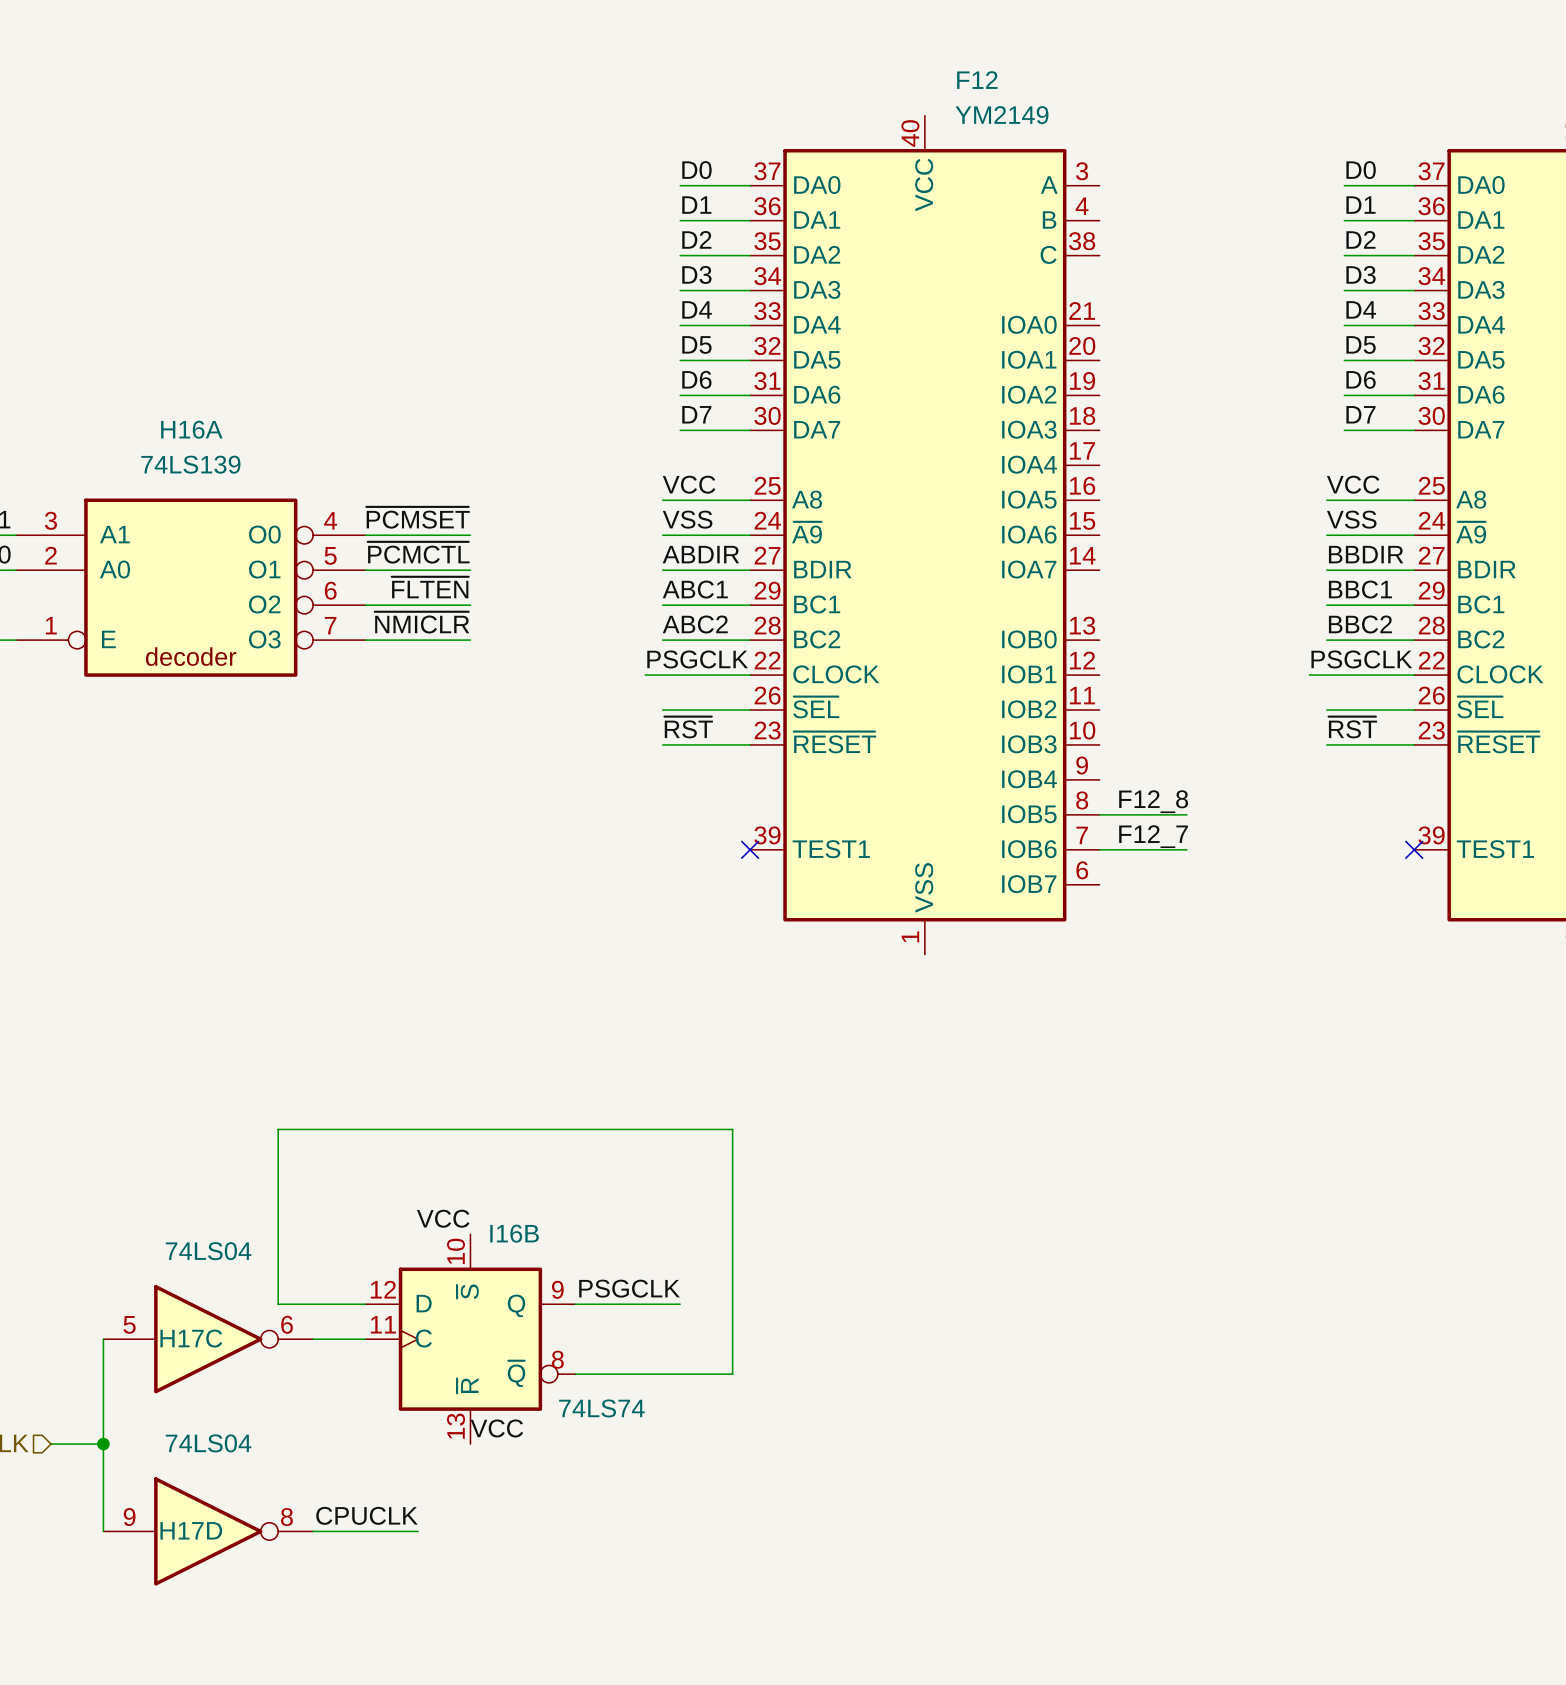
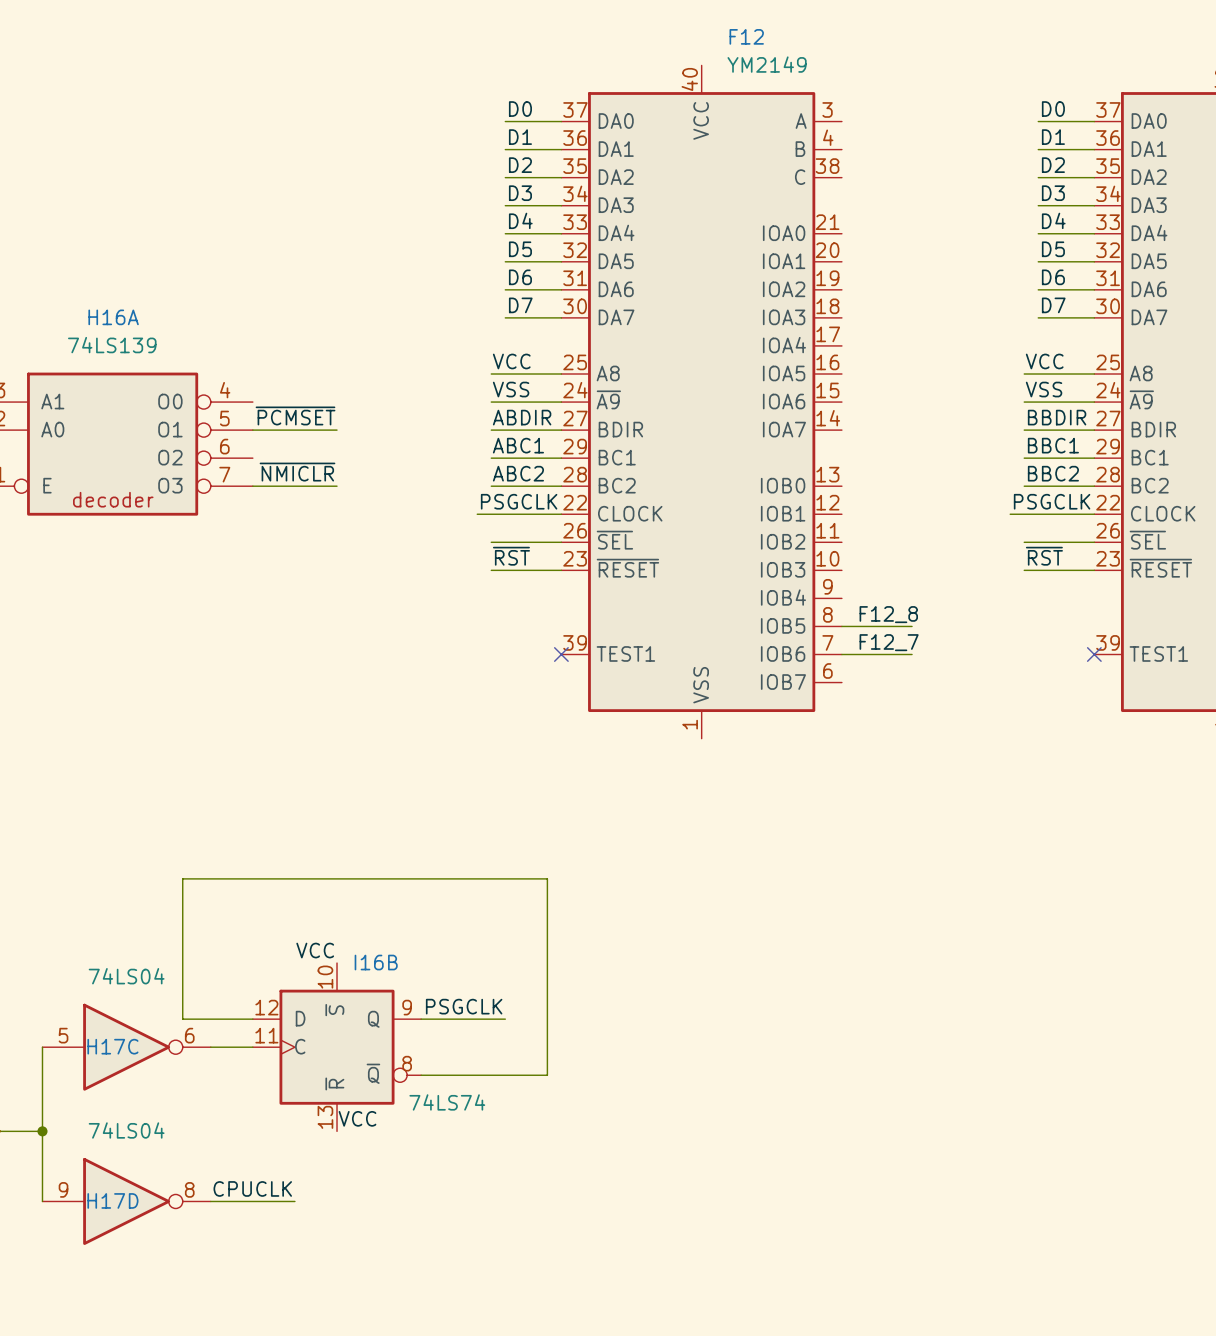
label: ~{PCMSET} (418, 517) -> none
wire: (365, 535) (470, 535) -> none
label: ~{PCMCTL} (418, 552) -> ~{PCMSET} (295, 415)
label: ~{FLTEN} (430, 587) -> none
wire: (365, 605) (470, 605) -> none

